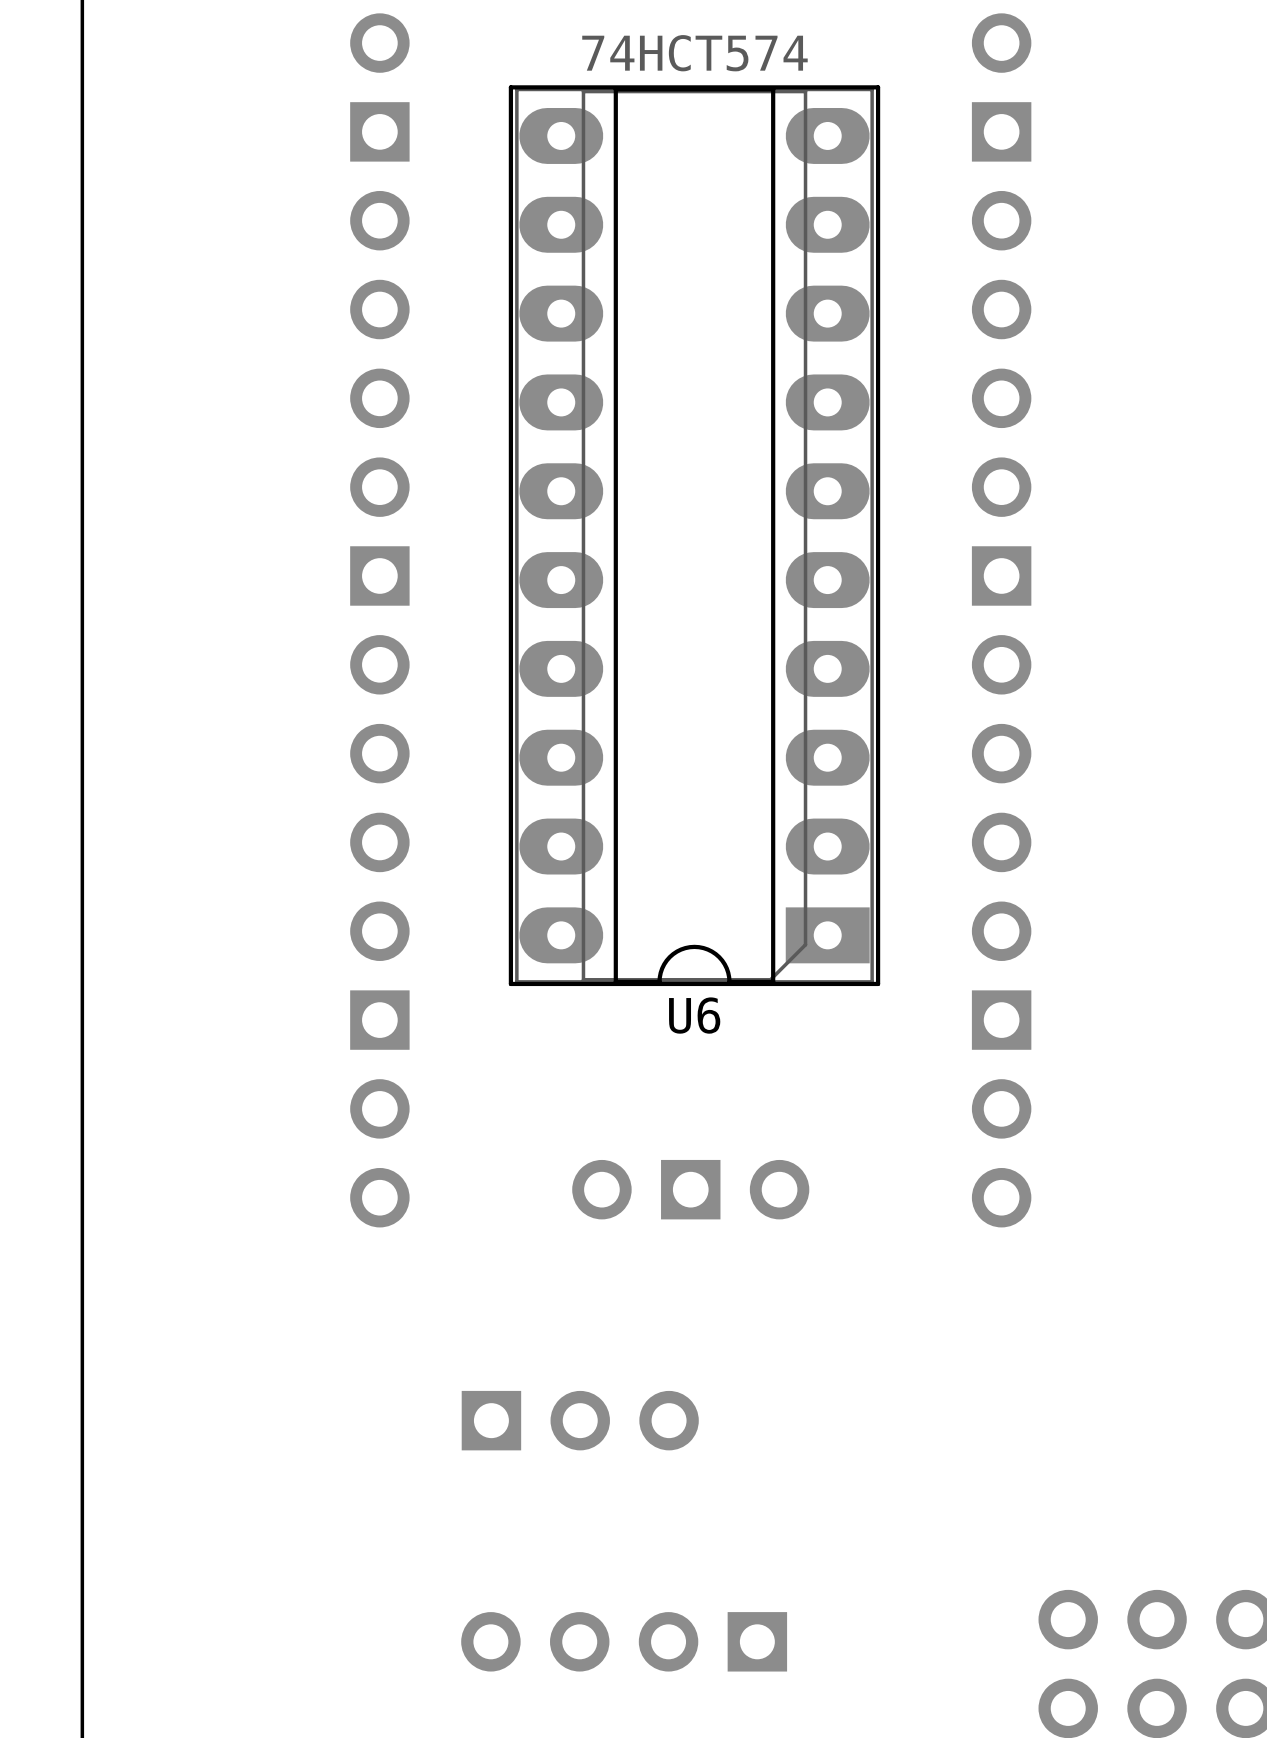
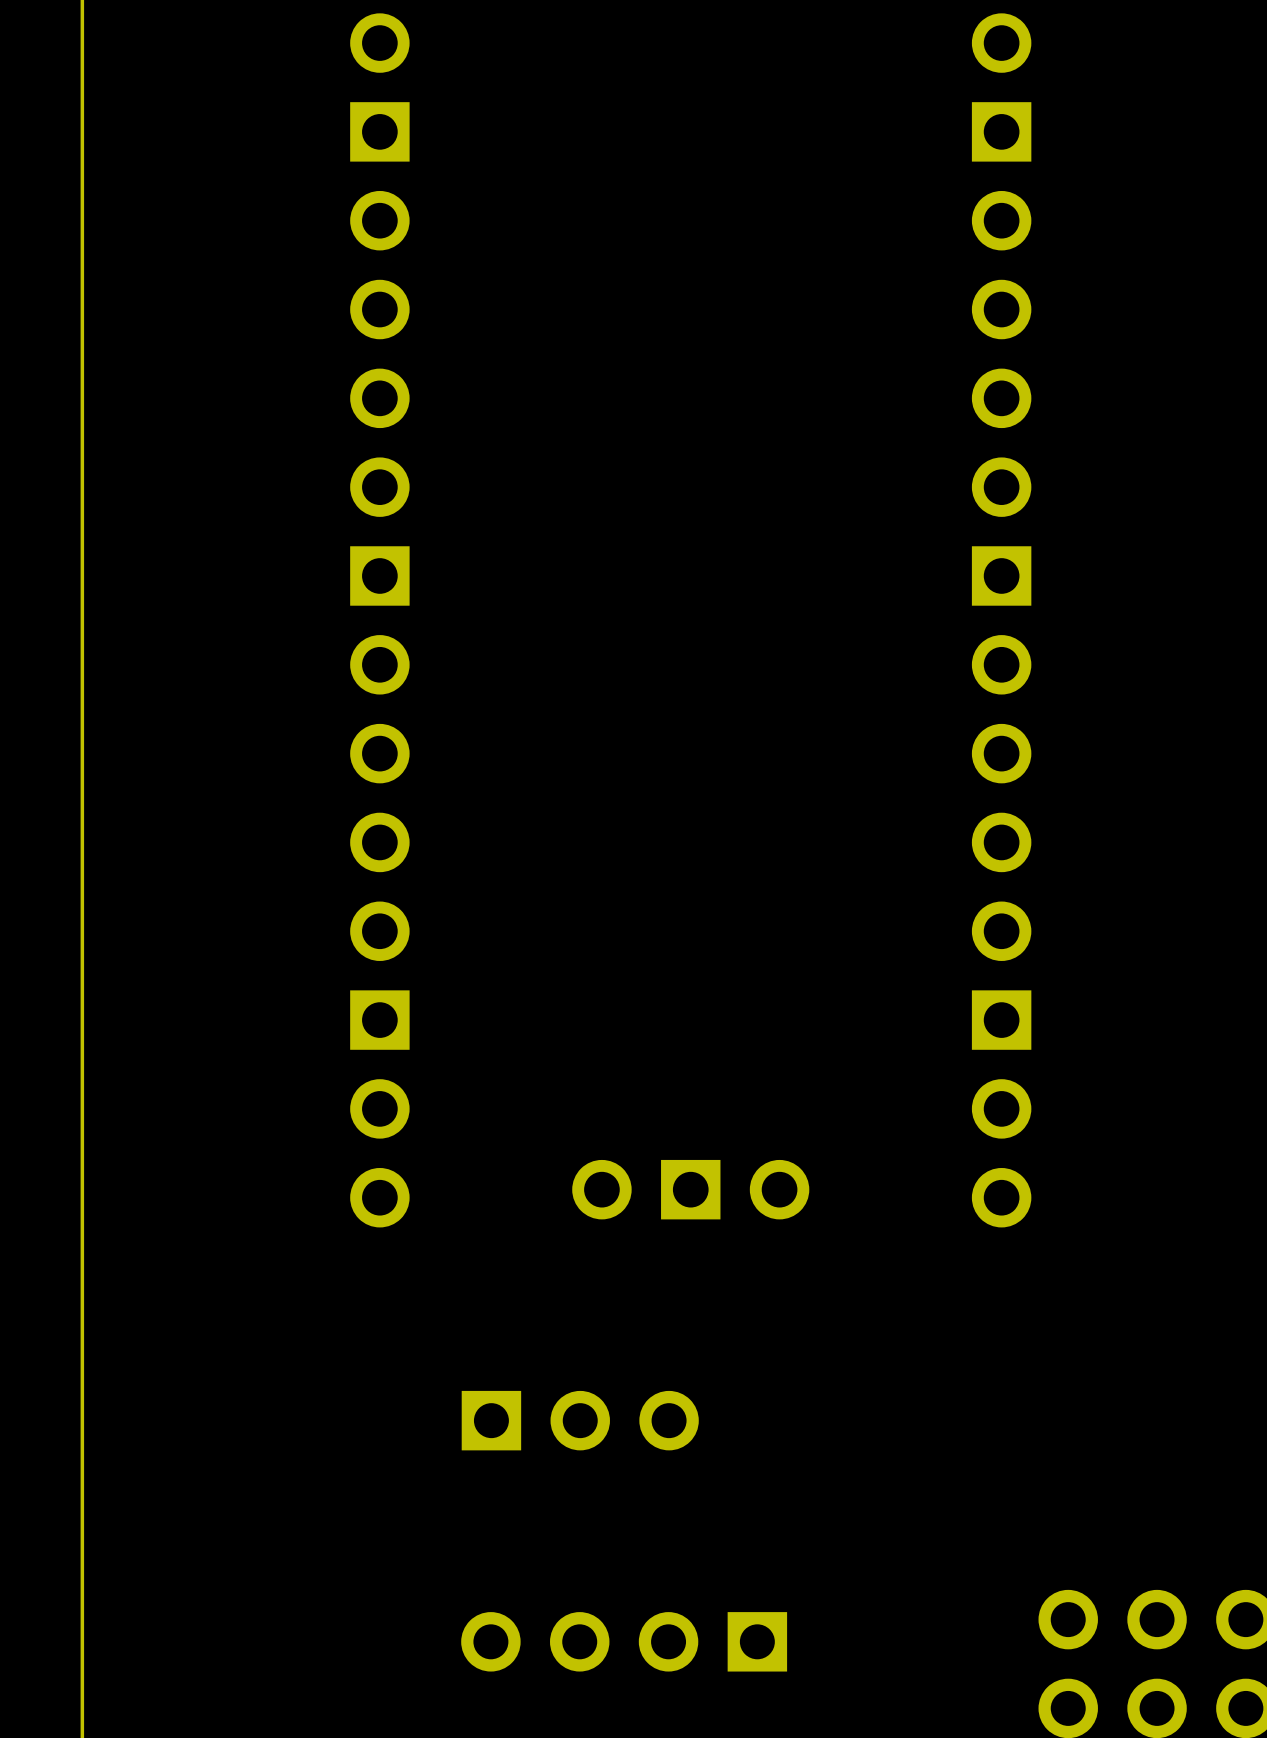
U6: 74HCT574 (694, 535) -> none

